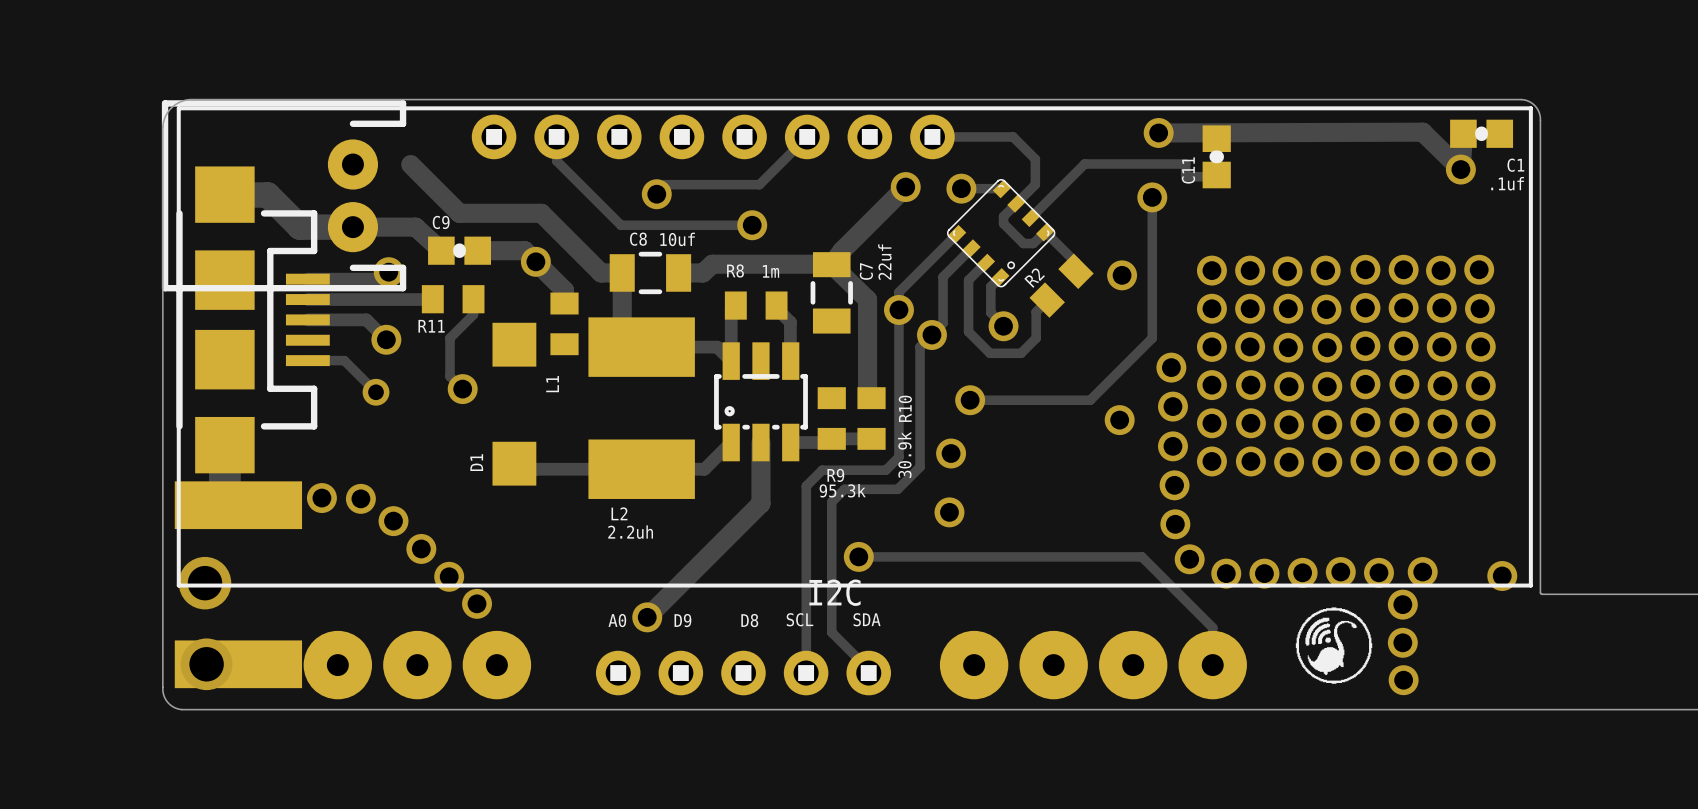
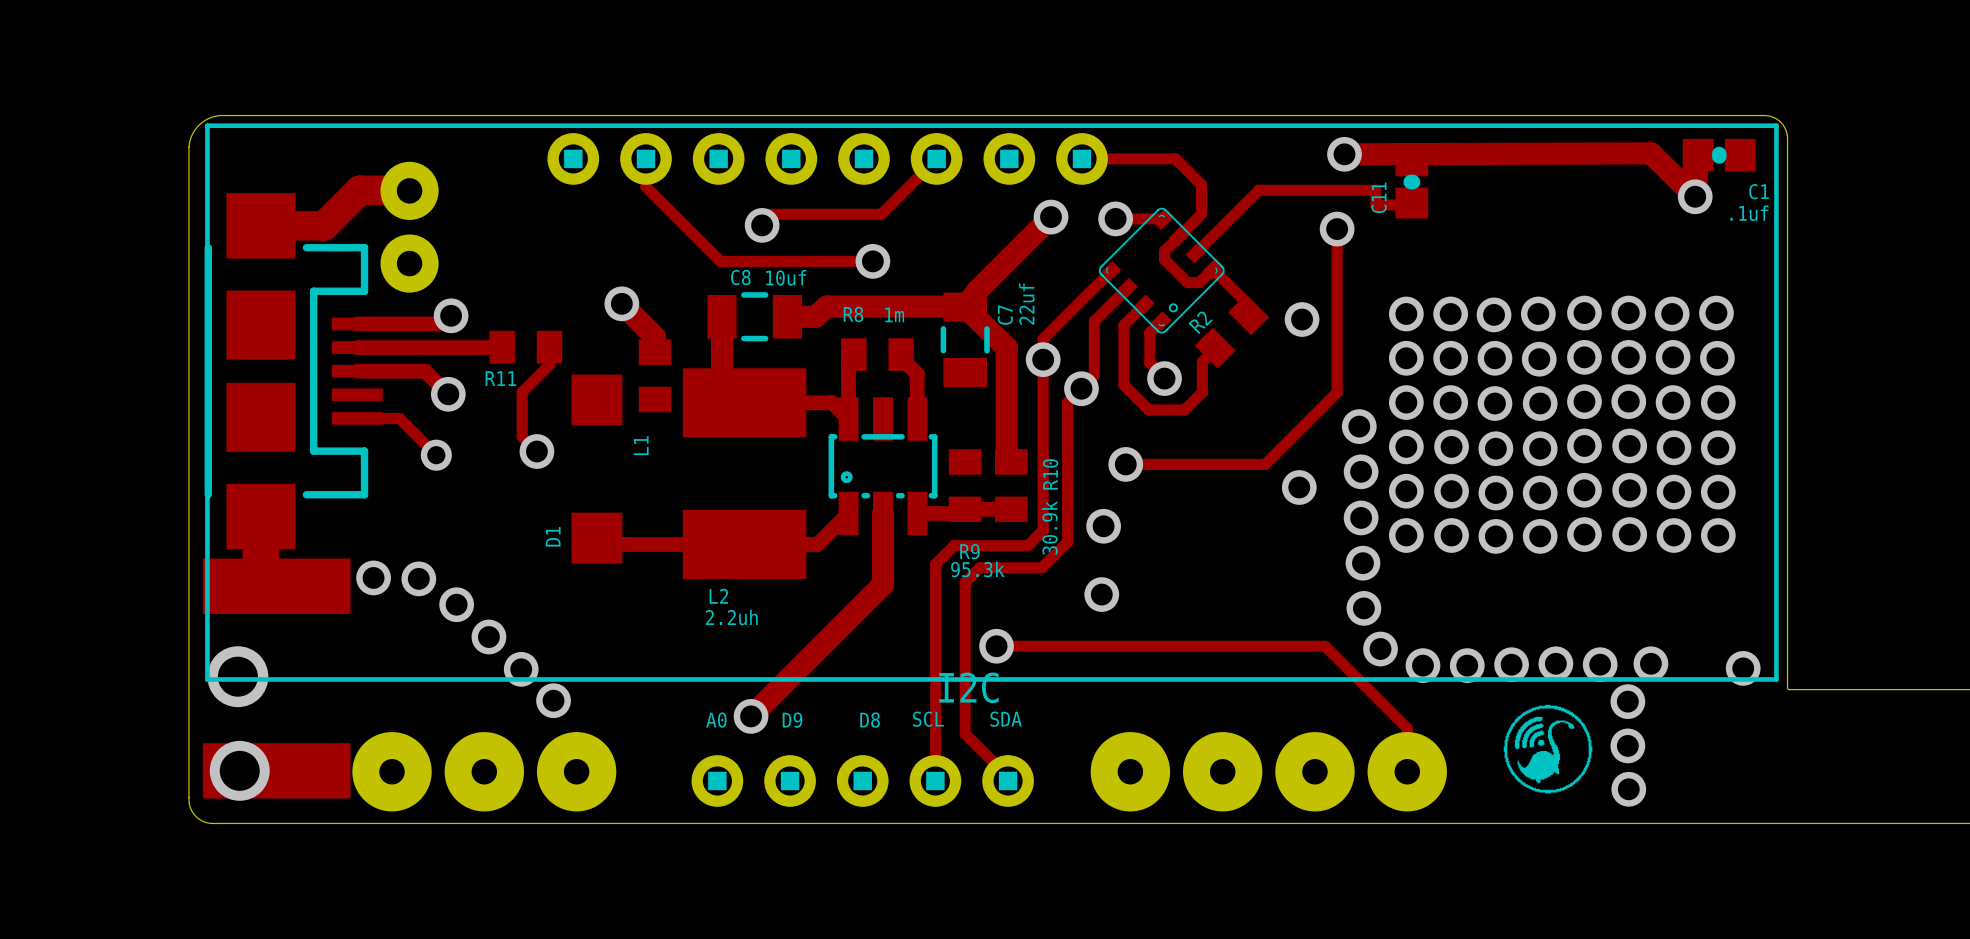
track: (410, 164) (459, 213) (541, 213) (601, 272) (622, 272) -> none
track: (225, 195) (267, 195) (299, 227) (415, 227) (441, 250) -> (260, 225) (324, 225) (359, 190) (409, 190)
part side: top (284, 195) -> bottom (409, 227)
C9: (459, 250) -> none
track: (477, 250) (524, 250) (535, 261) -> none

